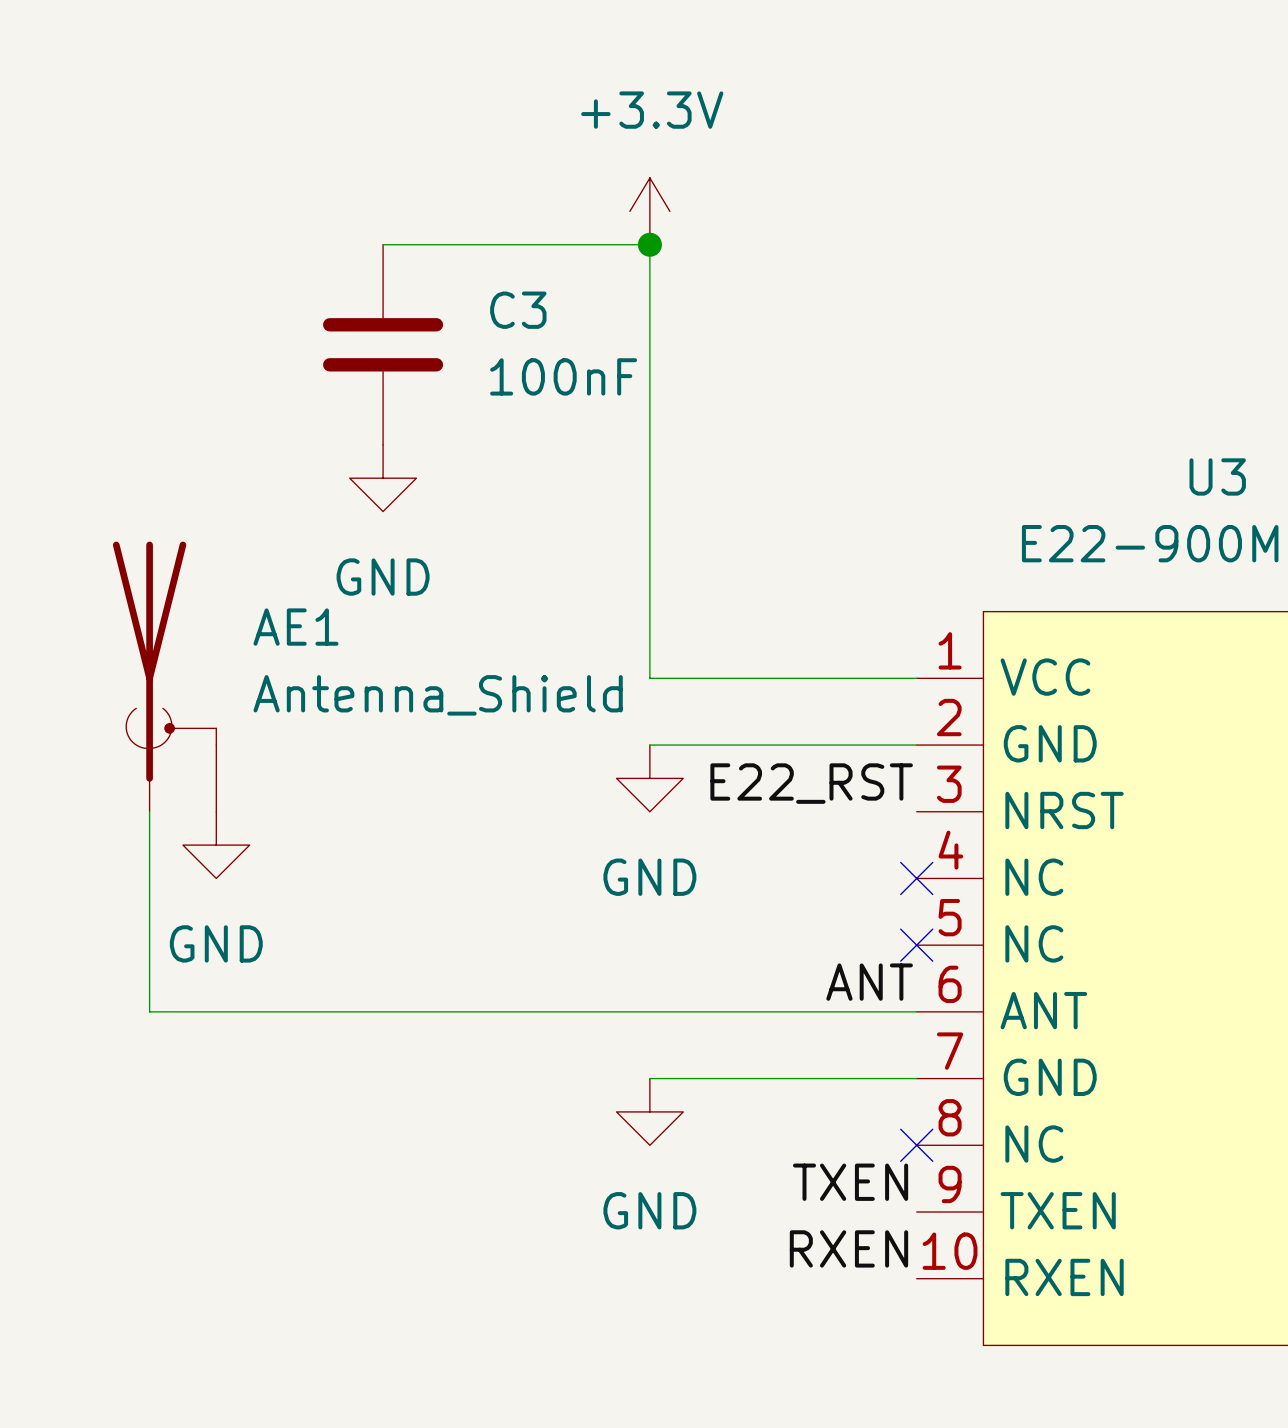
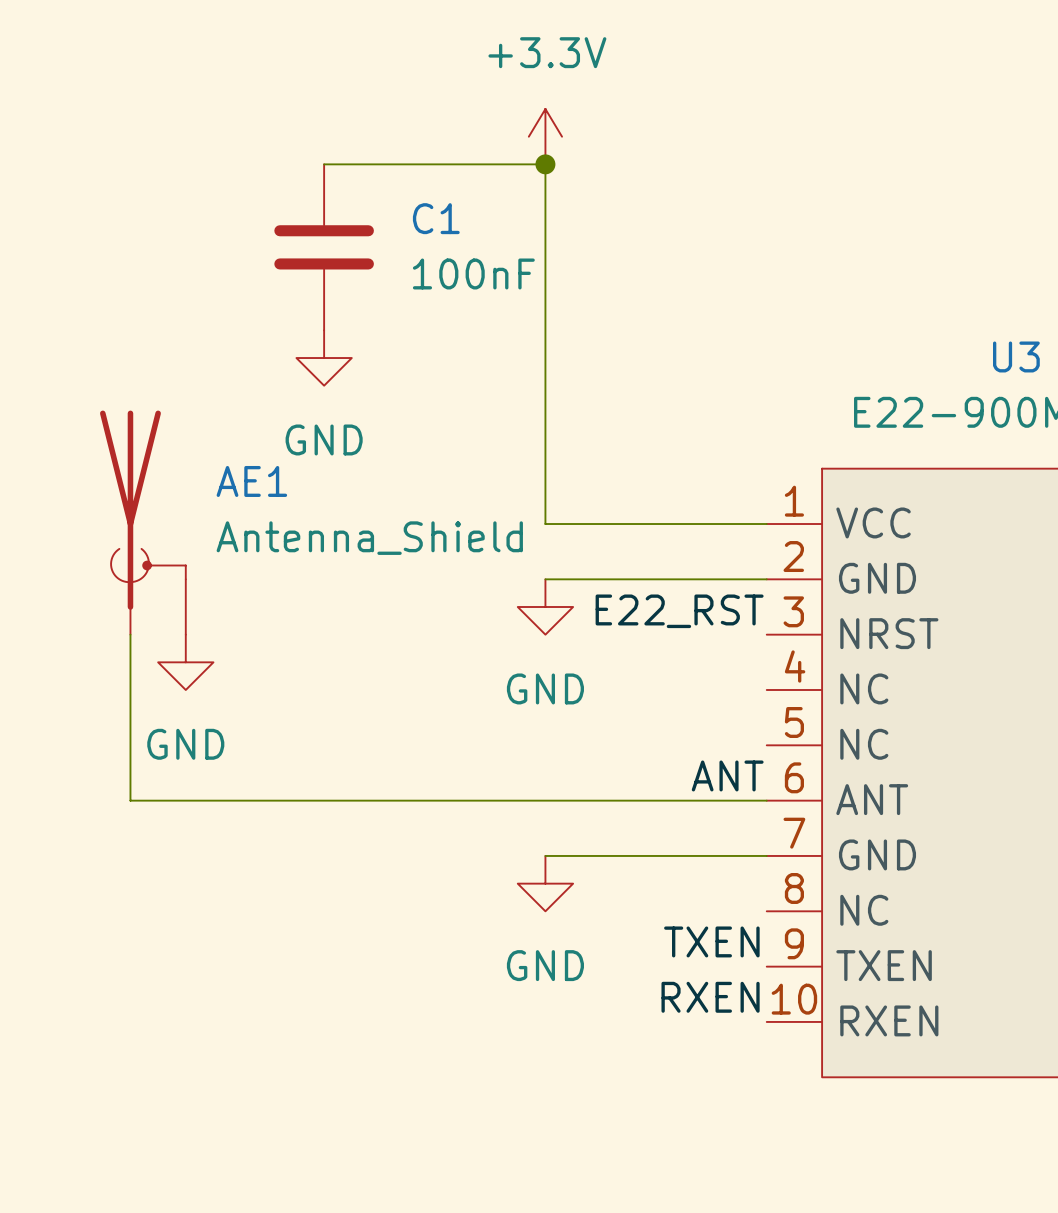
C3 name: C3 (518, 310) -> C1 (436, 218)
no-connect mark: (916, 878) -> none
no-connect mark: (916, 945) -> none
no-connect mark: (916, 1145) -> none

